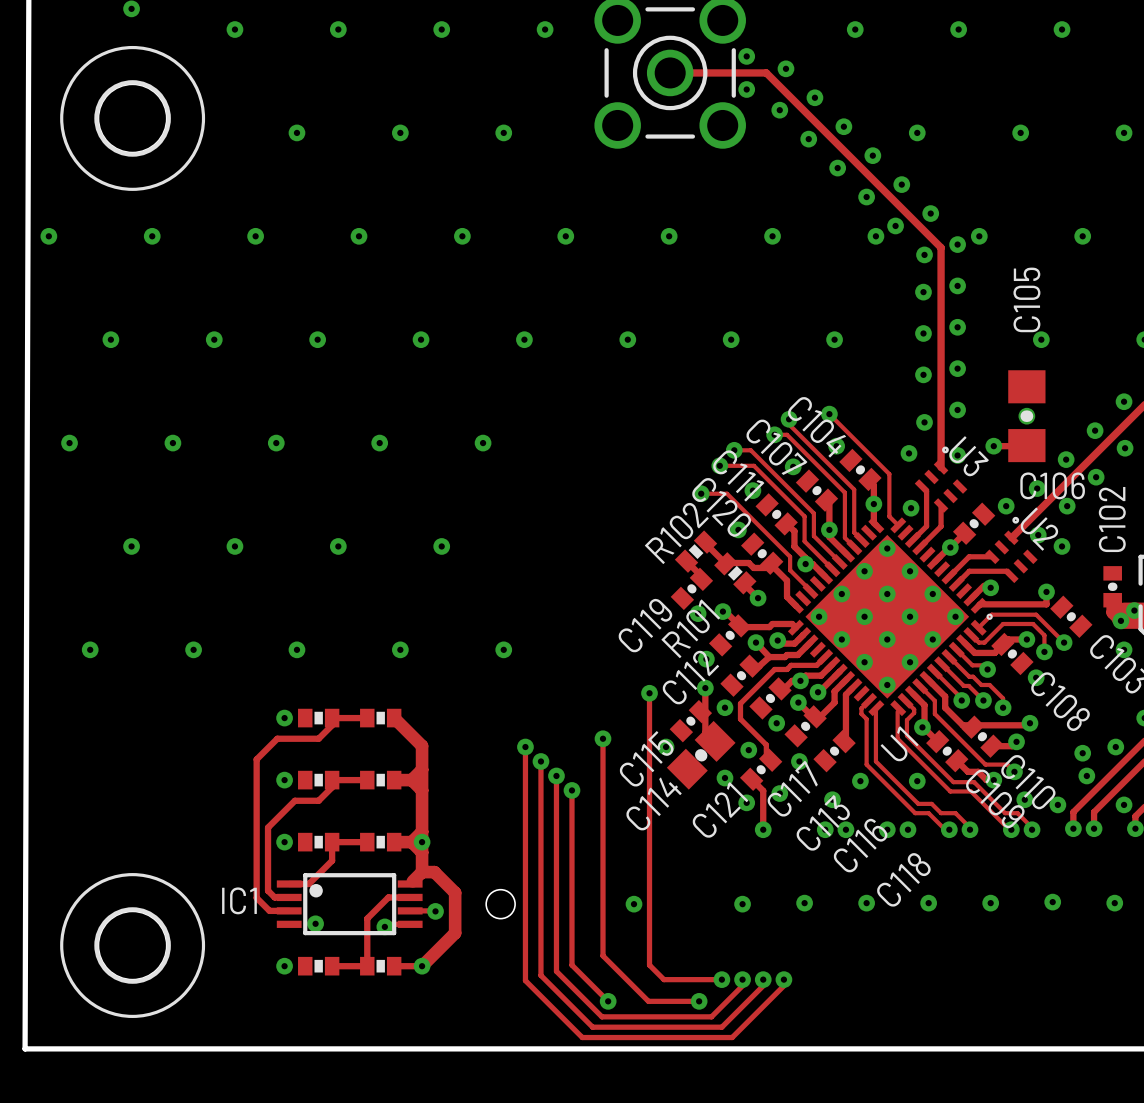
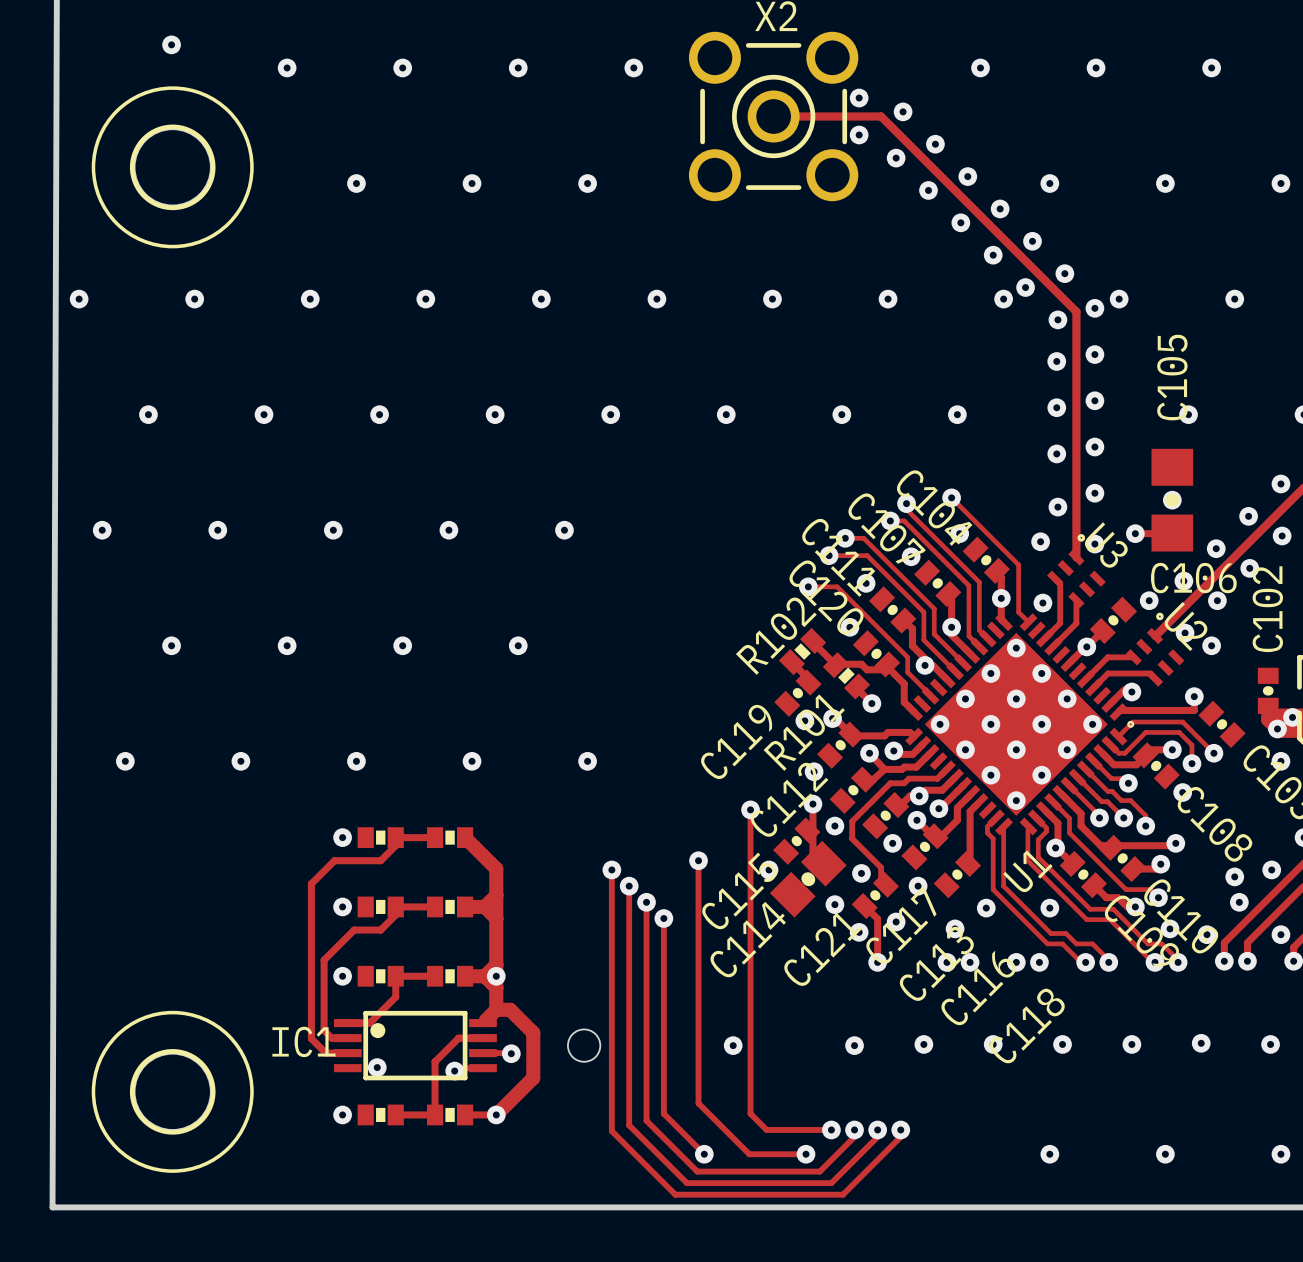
via: none -> (1049, 1154)
via: none -> (1165, 1154)
via: none -> (1280, 1154)

